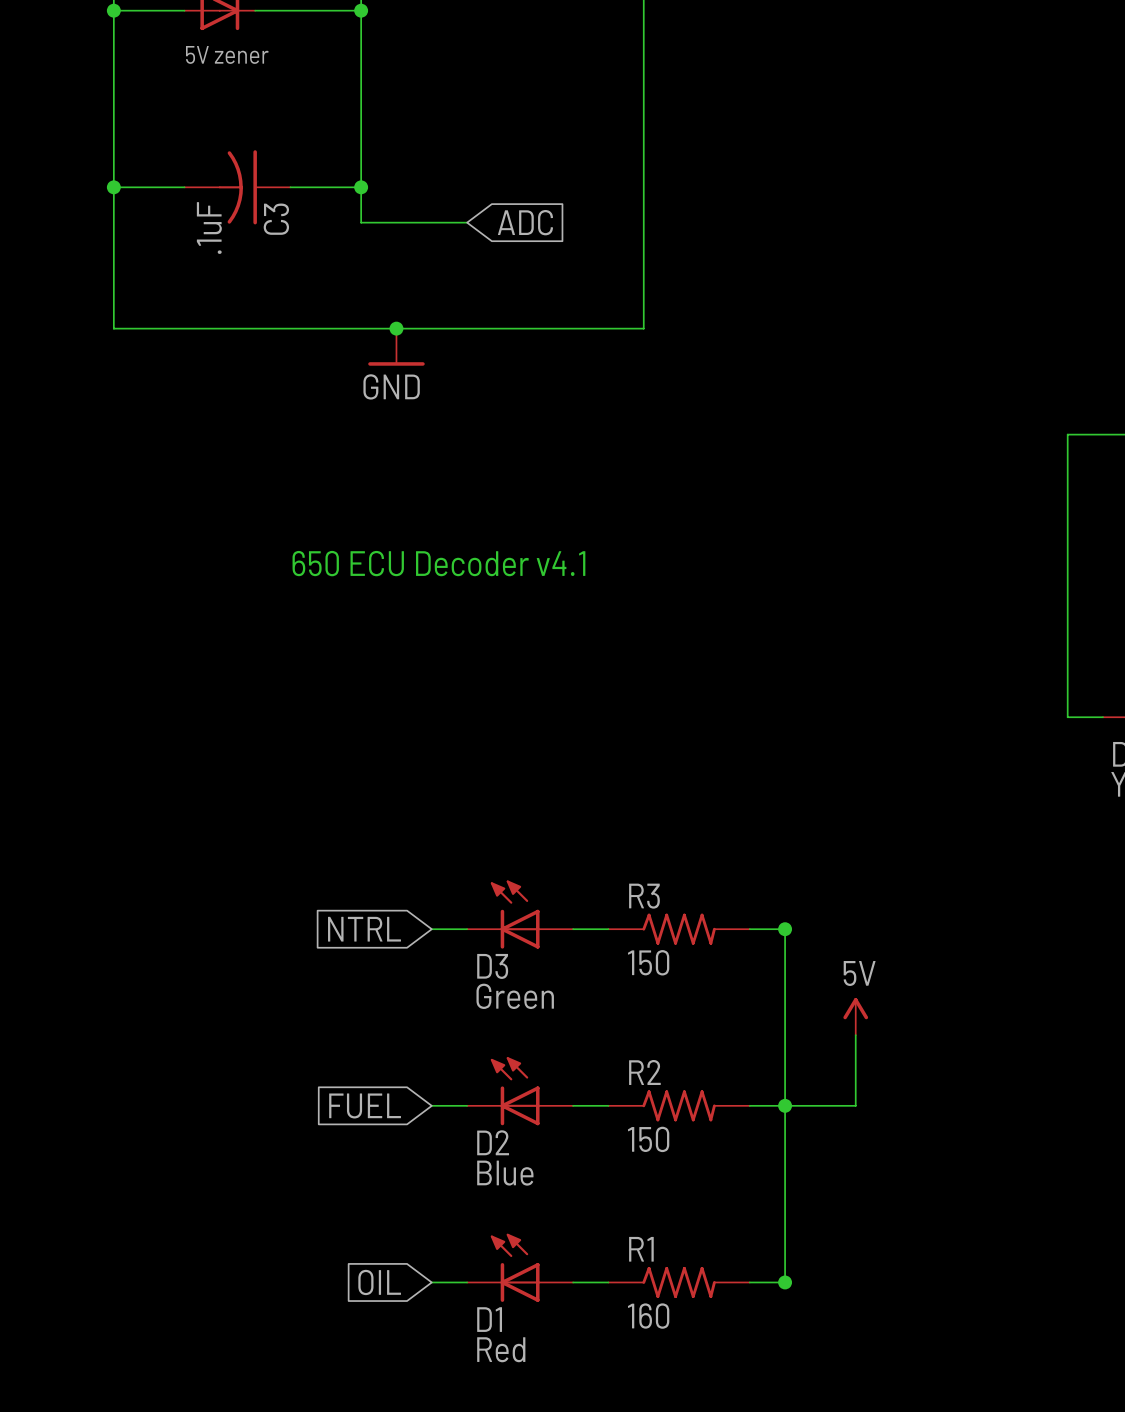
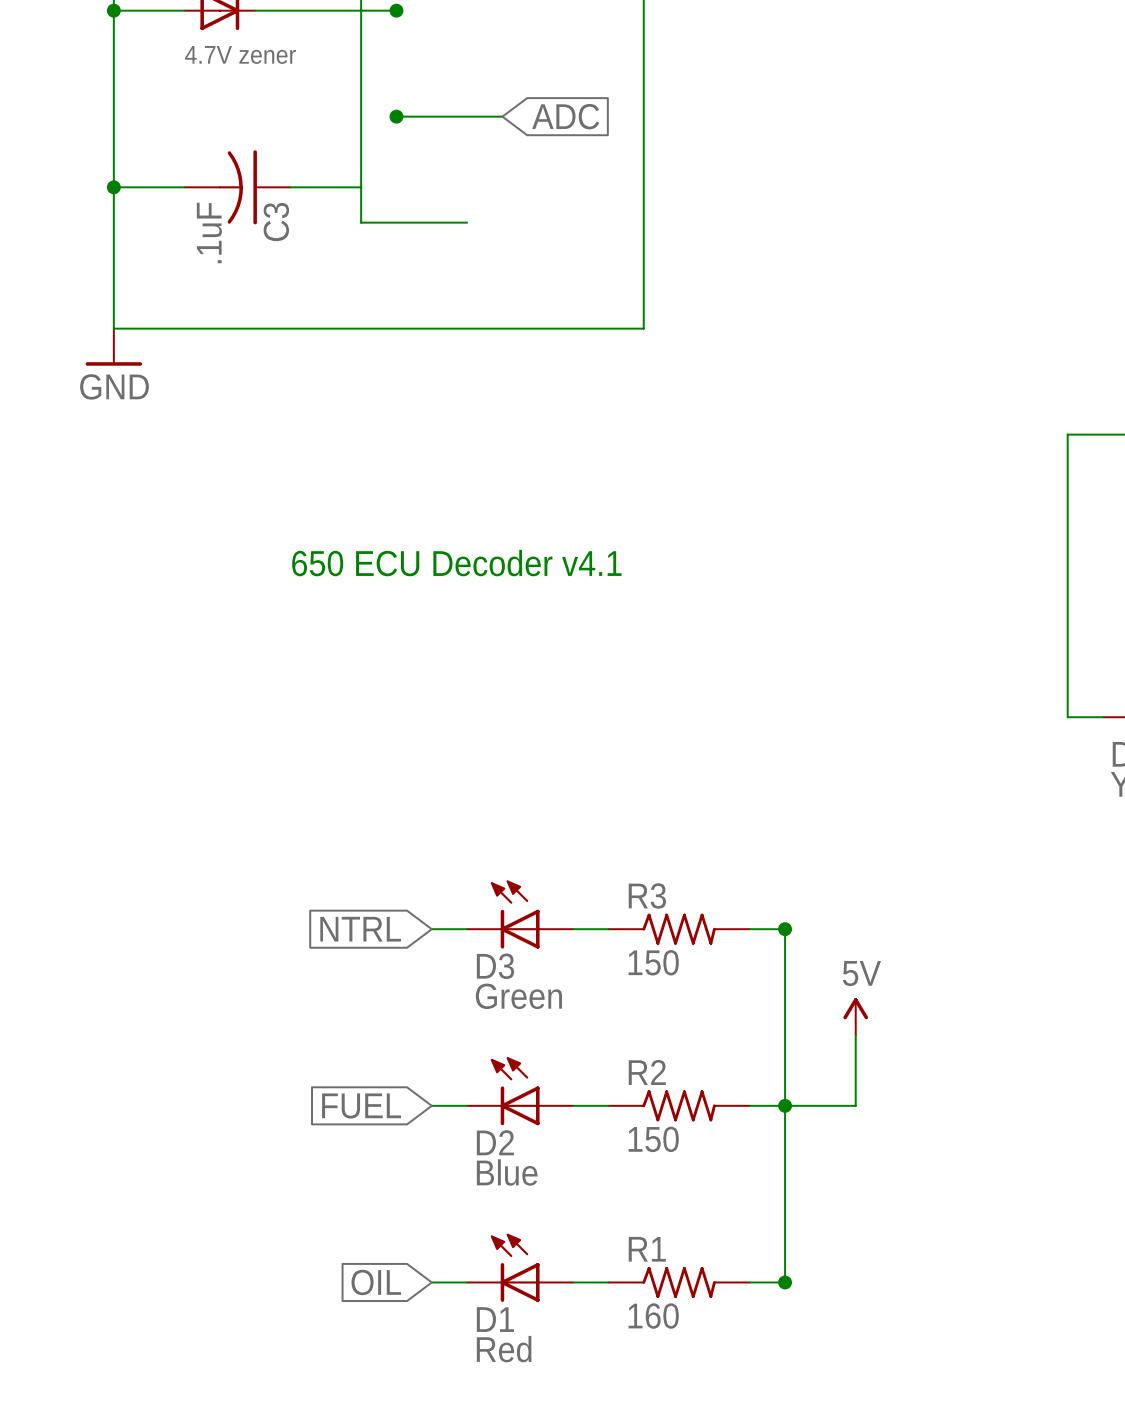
wire: none -> (361, 10) (396, 10)
junction position: (361, 10) -> (396, 10)
part value: 5V zener (227, 54) -> 4.7V zener (240, 54)
wire: none -> (396, 116) (502, 116)
junction: none -> (396, 116)
junction: (361, 187) -> none
global label position: ADC (525, 222) -> ADC (565, 116)
junction: (396, 328) -> none
power symbol position: GND (396, 347) -> GND (113, 347)

